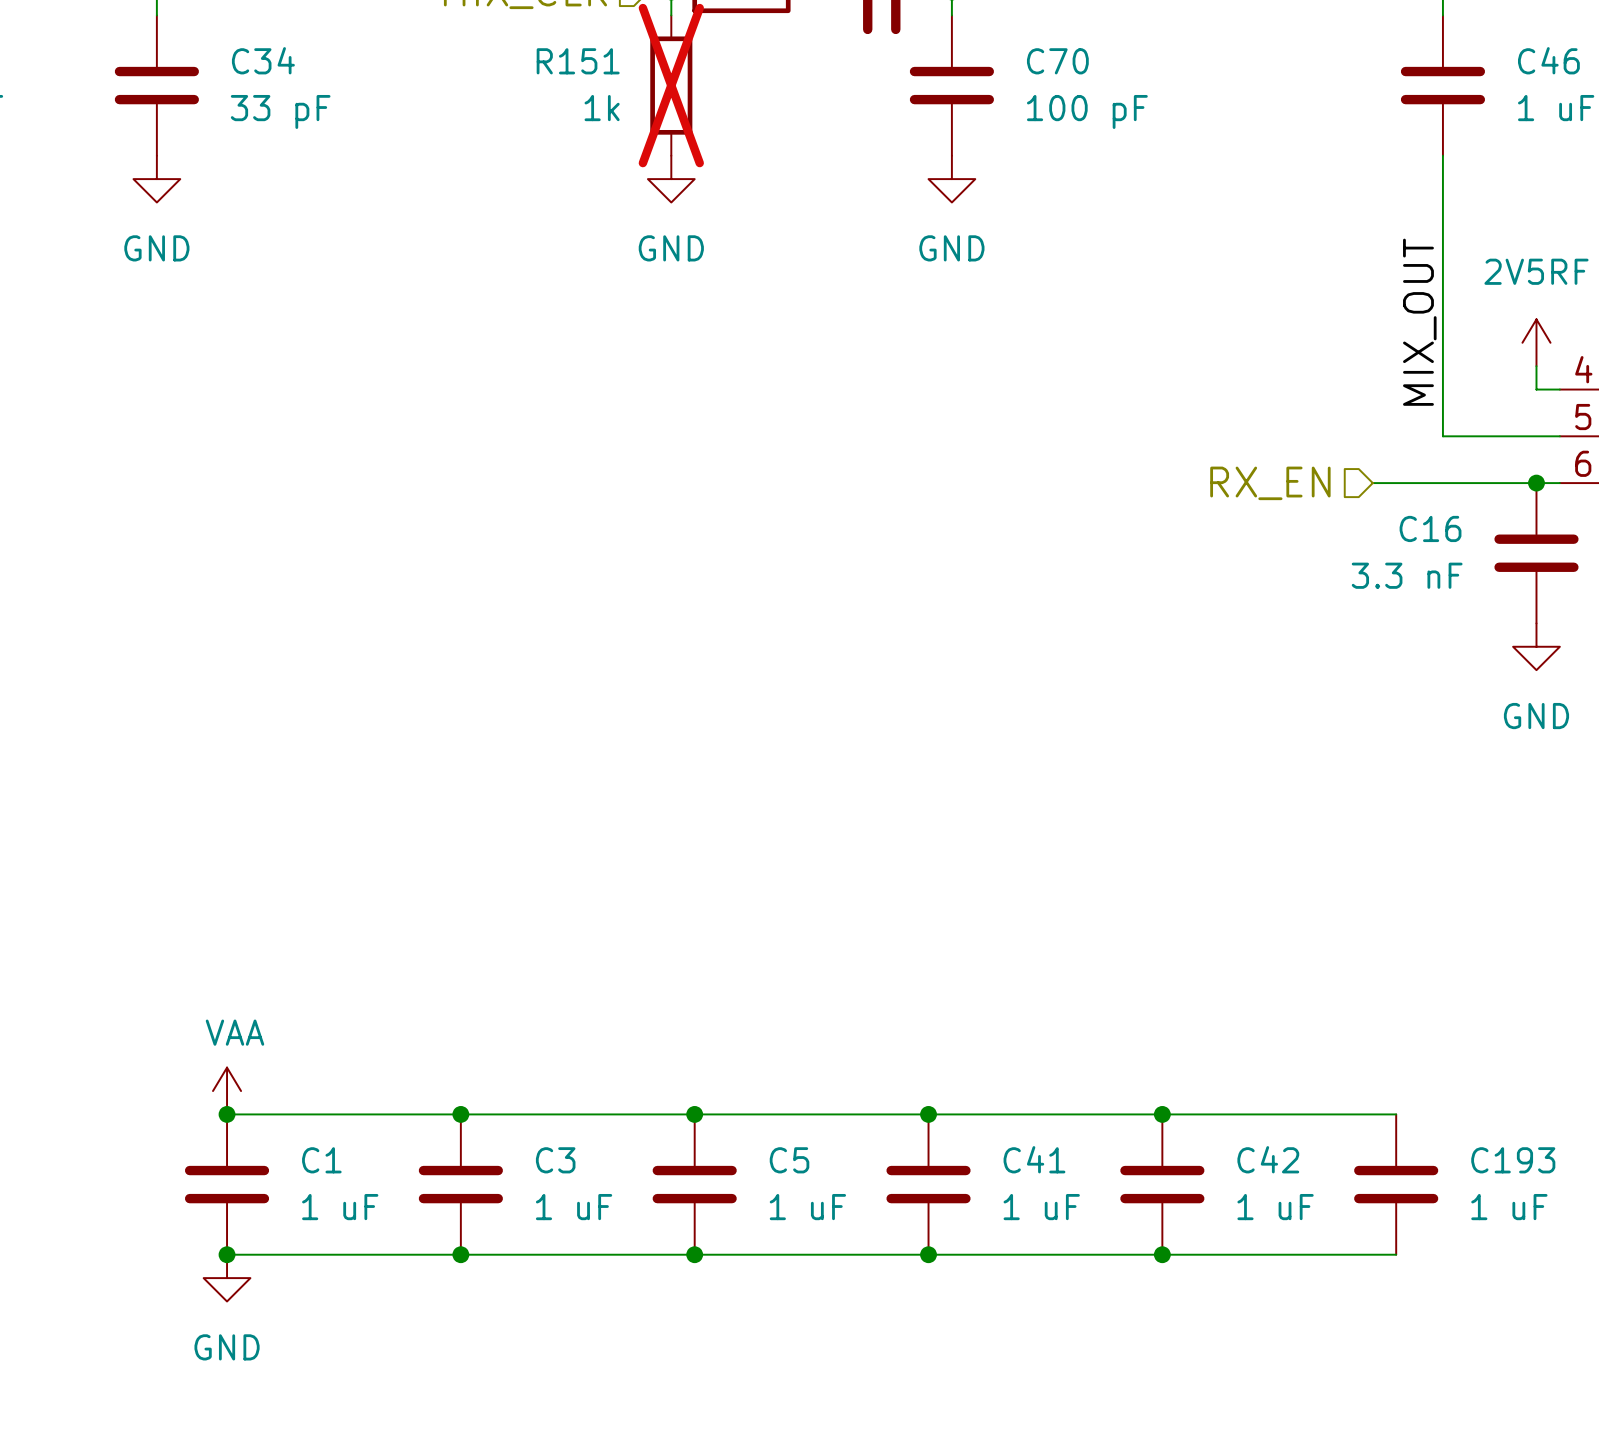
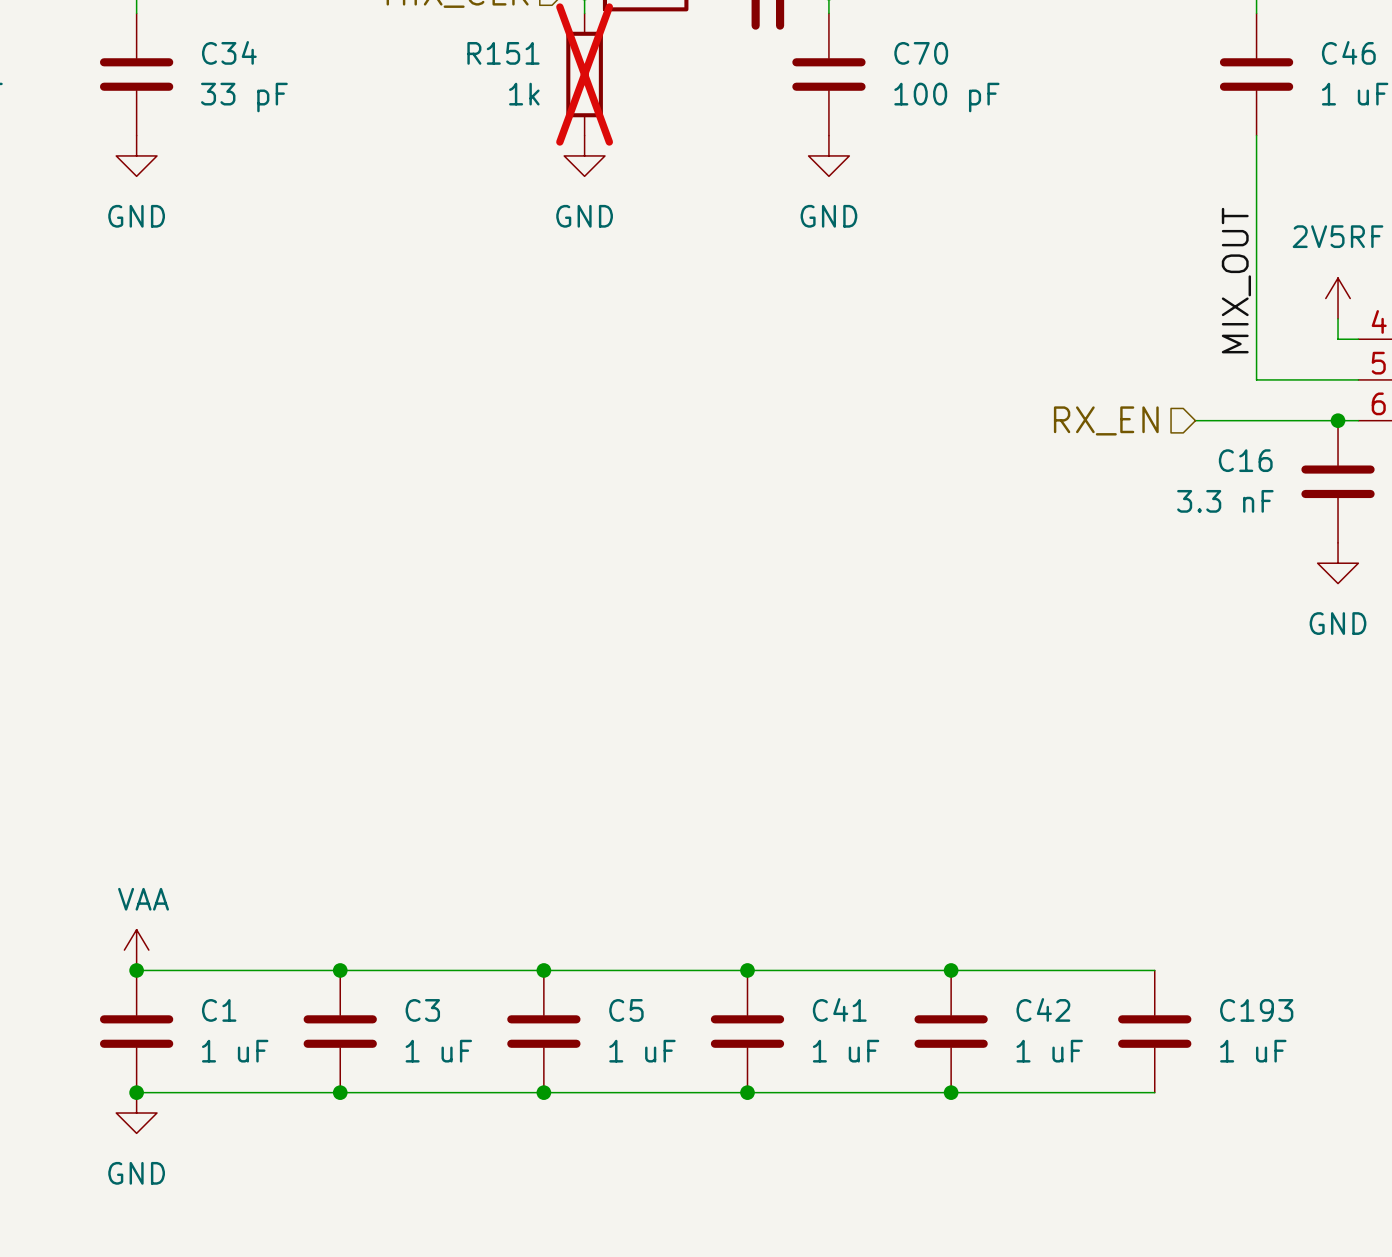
power symbol position: VAA (227, 1091) -> VAA (136, 950)
wire: none -> (136, 970) (197, 970)
junction position: (227, 1114) -> (136, 970)
junction position: (460, 1114) -> (340, 970)
junction position: (694, 1114) -> (543, 970)
junction position: (928, 1114) -> (747, 970)
junction position: (1162, 1114) -> (951, 970)
wire: (1326, 1114) (1396, 1114) -> none
C1 position: (227, 1184) -> (136, 1031)
C3 position: (460, 1184) -> (340, 1031)
C5 position: (694, 1184) -> (543, 1031)
C41 position: (928, 1184) -> (747, 1031)
C42 position: (1162, 1184) -> (951, 1031)
C193 position: (1396, 1184) -> (1154, 1031)
wire: none -> (136, 1092) (197, 1092)
junction position: (227, 1254) -> (136, 1092)
junction position: (460, 1254) -> (340, 1092)
junction position: (694, 1254) -> (543, 1092)
junction position: (928, 1254) -> (747, 1092)
junction position: (1162, 1254) -> (951, 1092)
wire: (1326, 1254) (1396, 1254) -> none
power symbol position: GND (227, 1278) -> GND (136, 1113)

